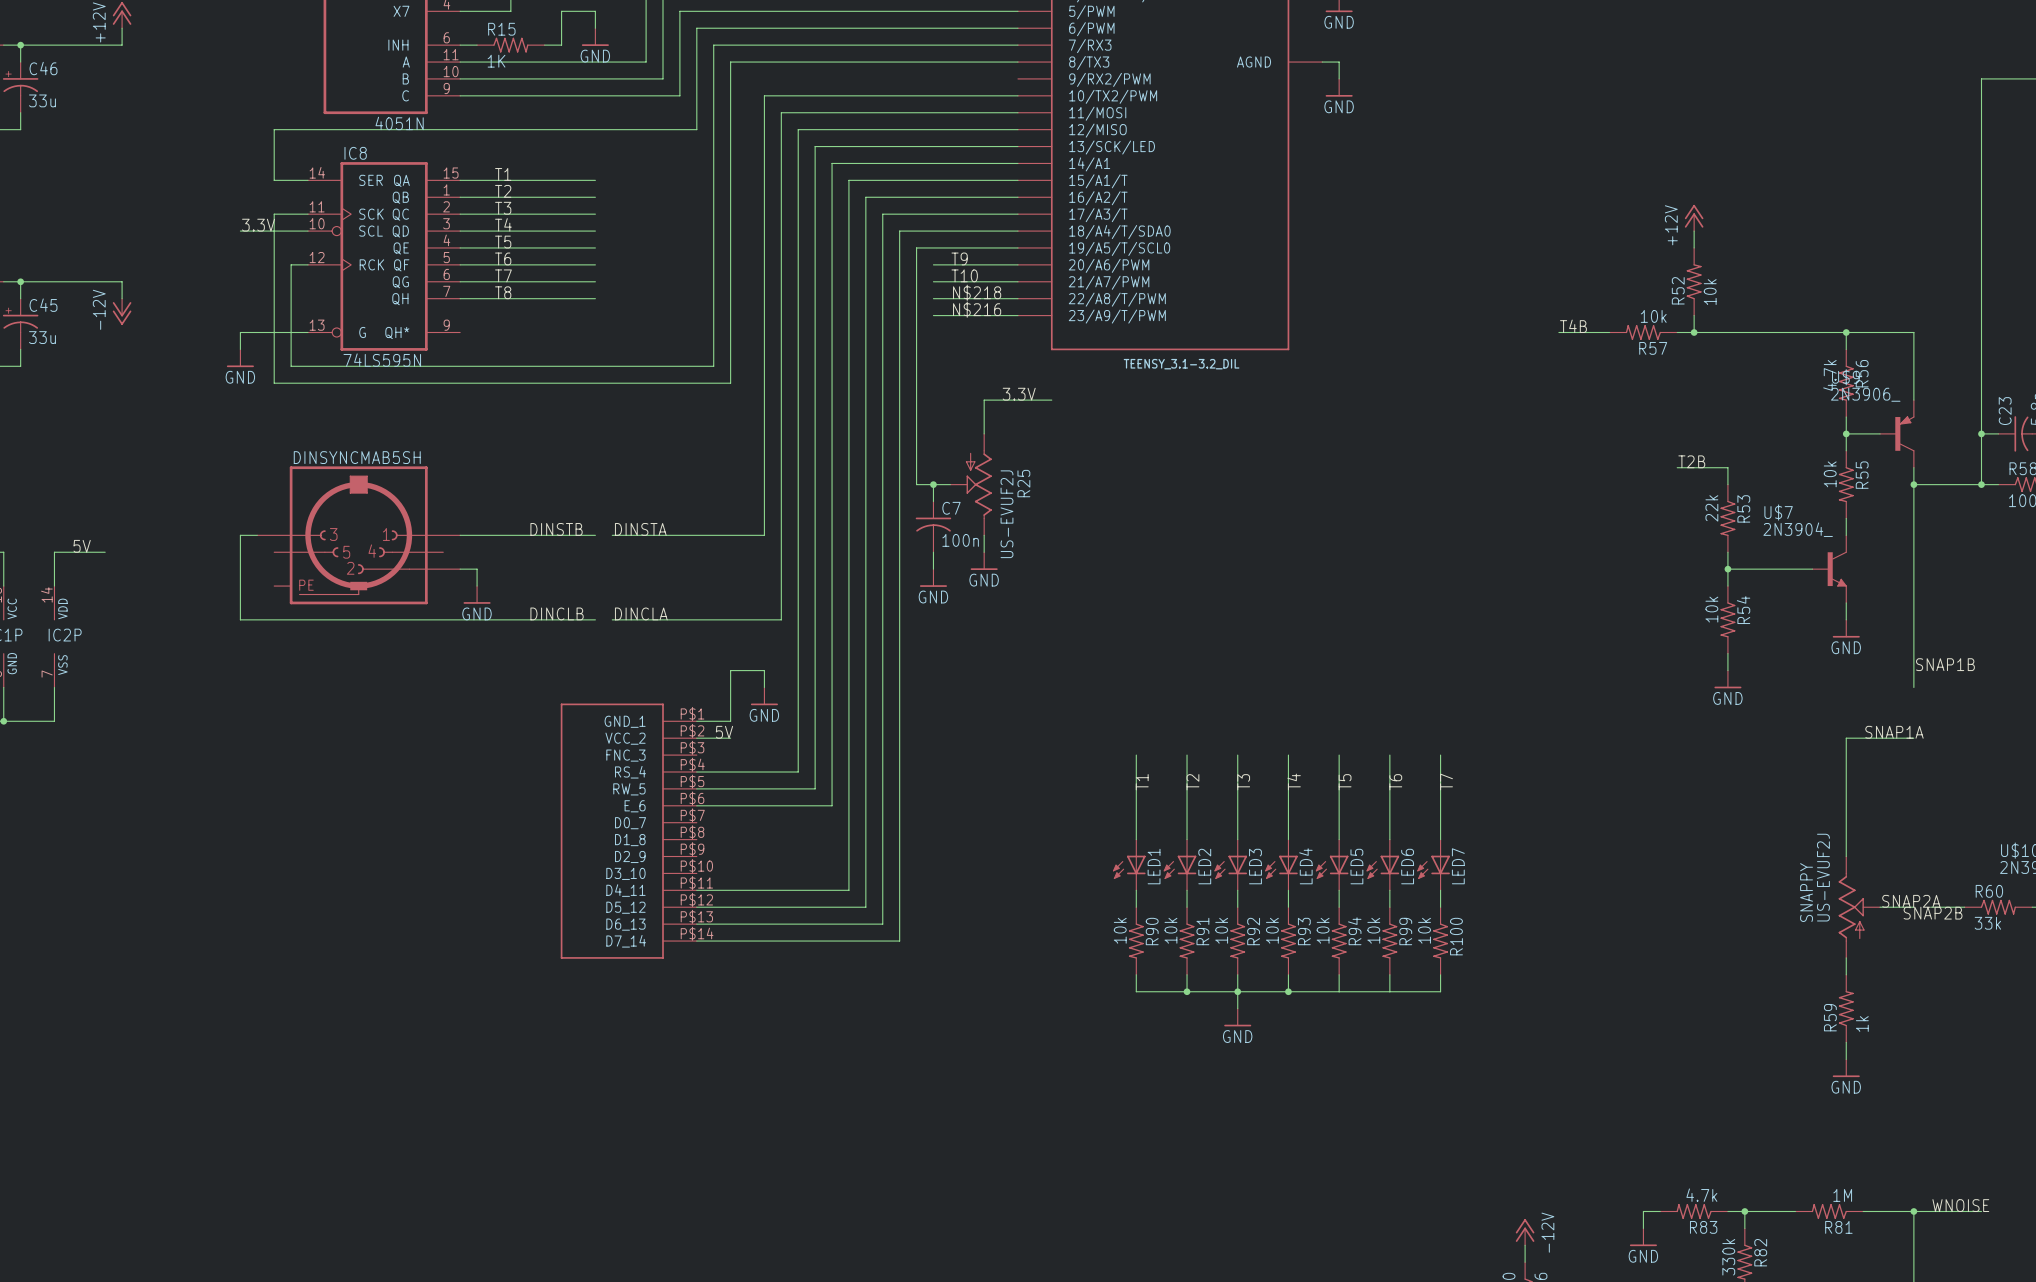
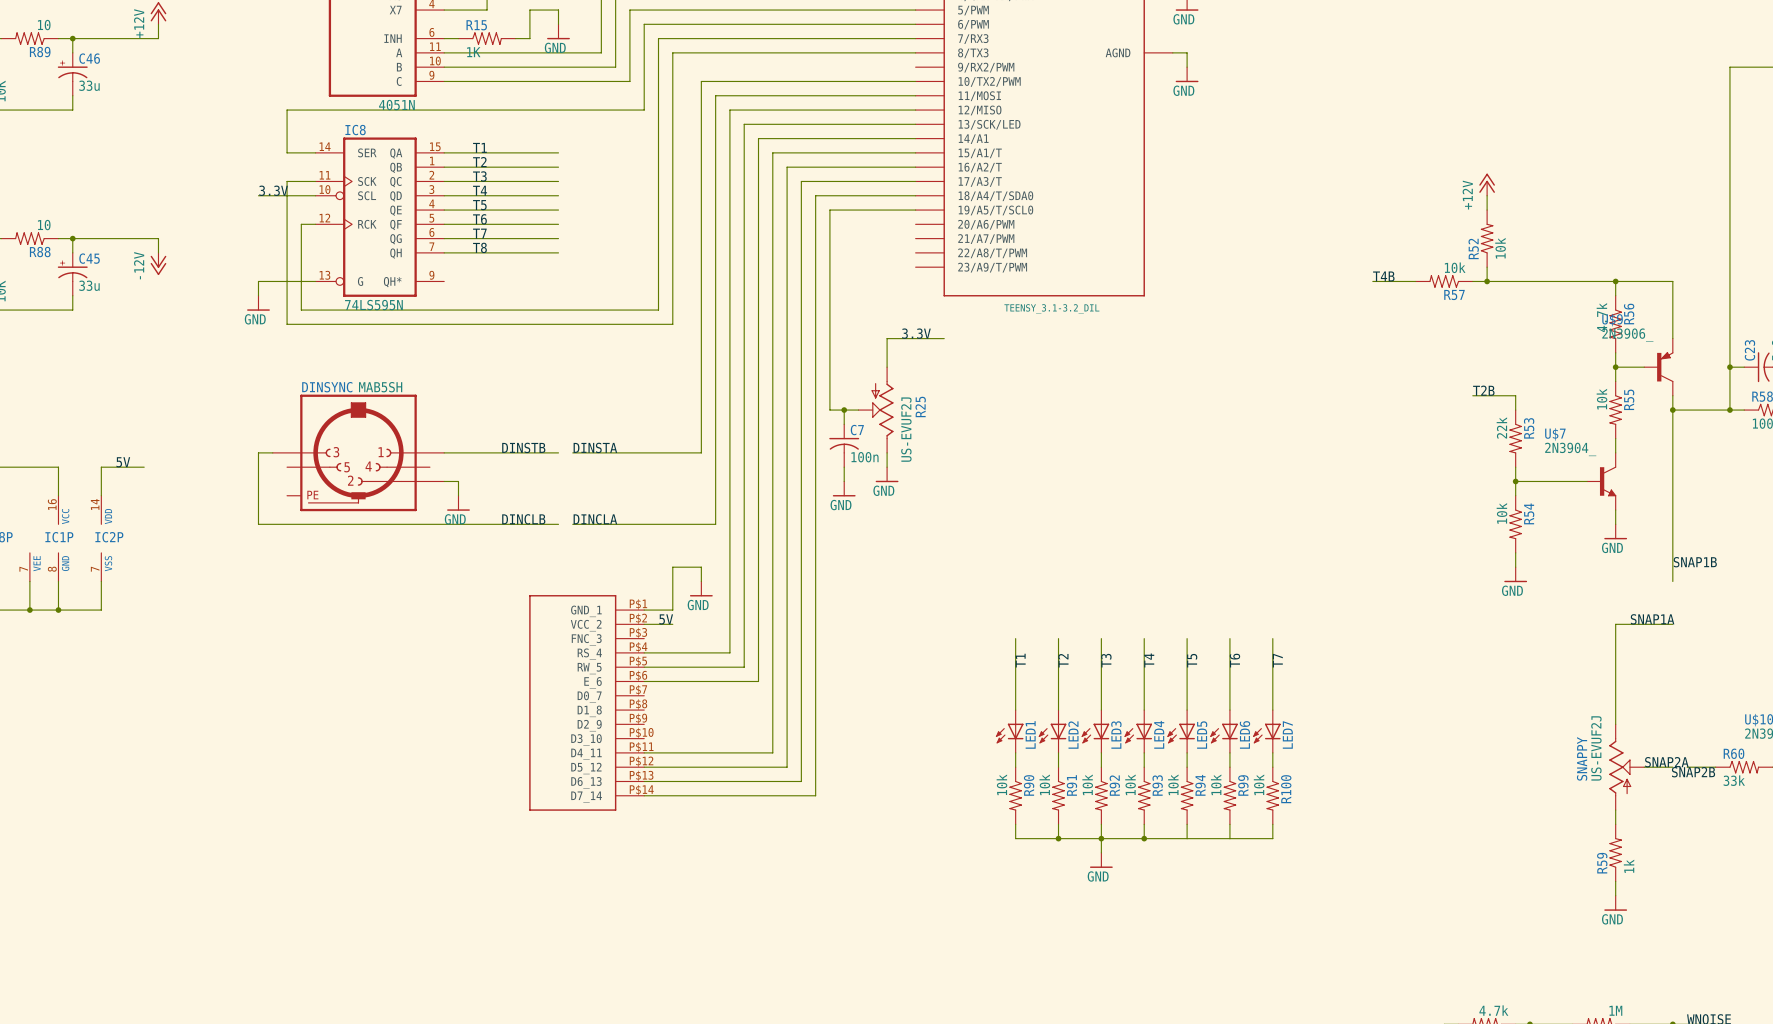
label: T9 (959, 258) -> none
wire: (933, 264) (1017, 264) -> none
label: T10 (964, 275) -> none
wire: (933, 281) (1017, 281) -> none
label: N$218 (977, 292) -> none
wire: (933, 298) (1017, 298) -> none
label: N$216 (977, 309) -> none
wire: (933, 315) (1017, 315) -> none

